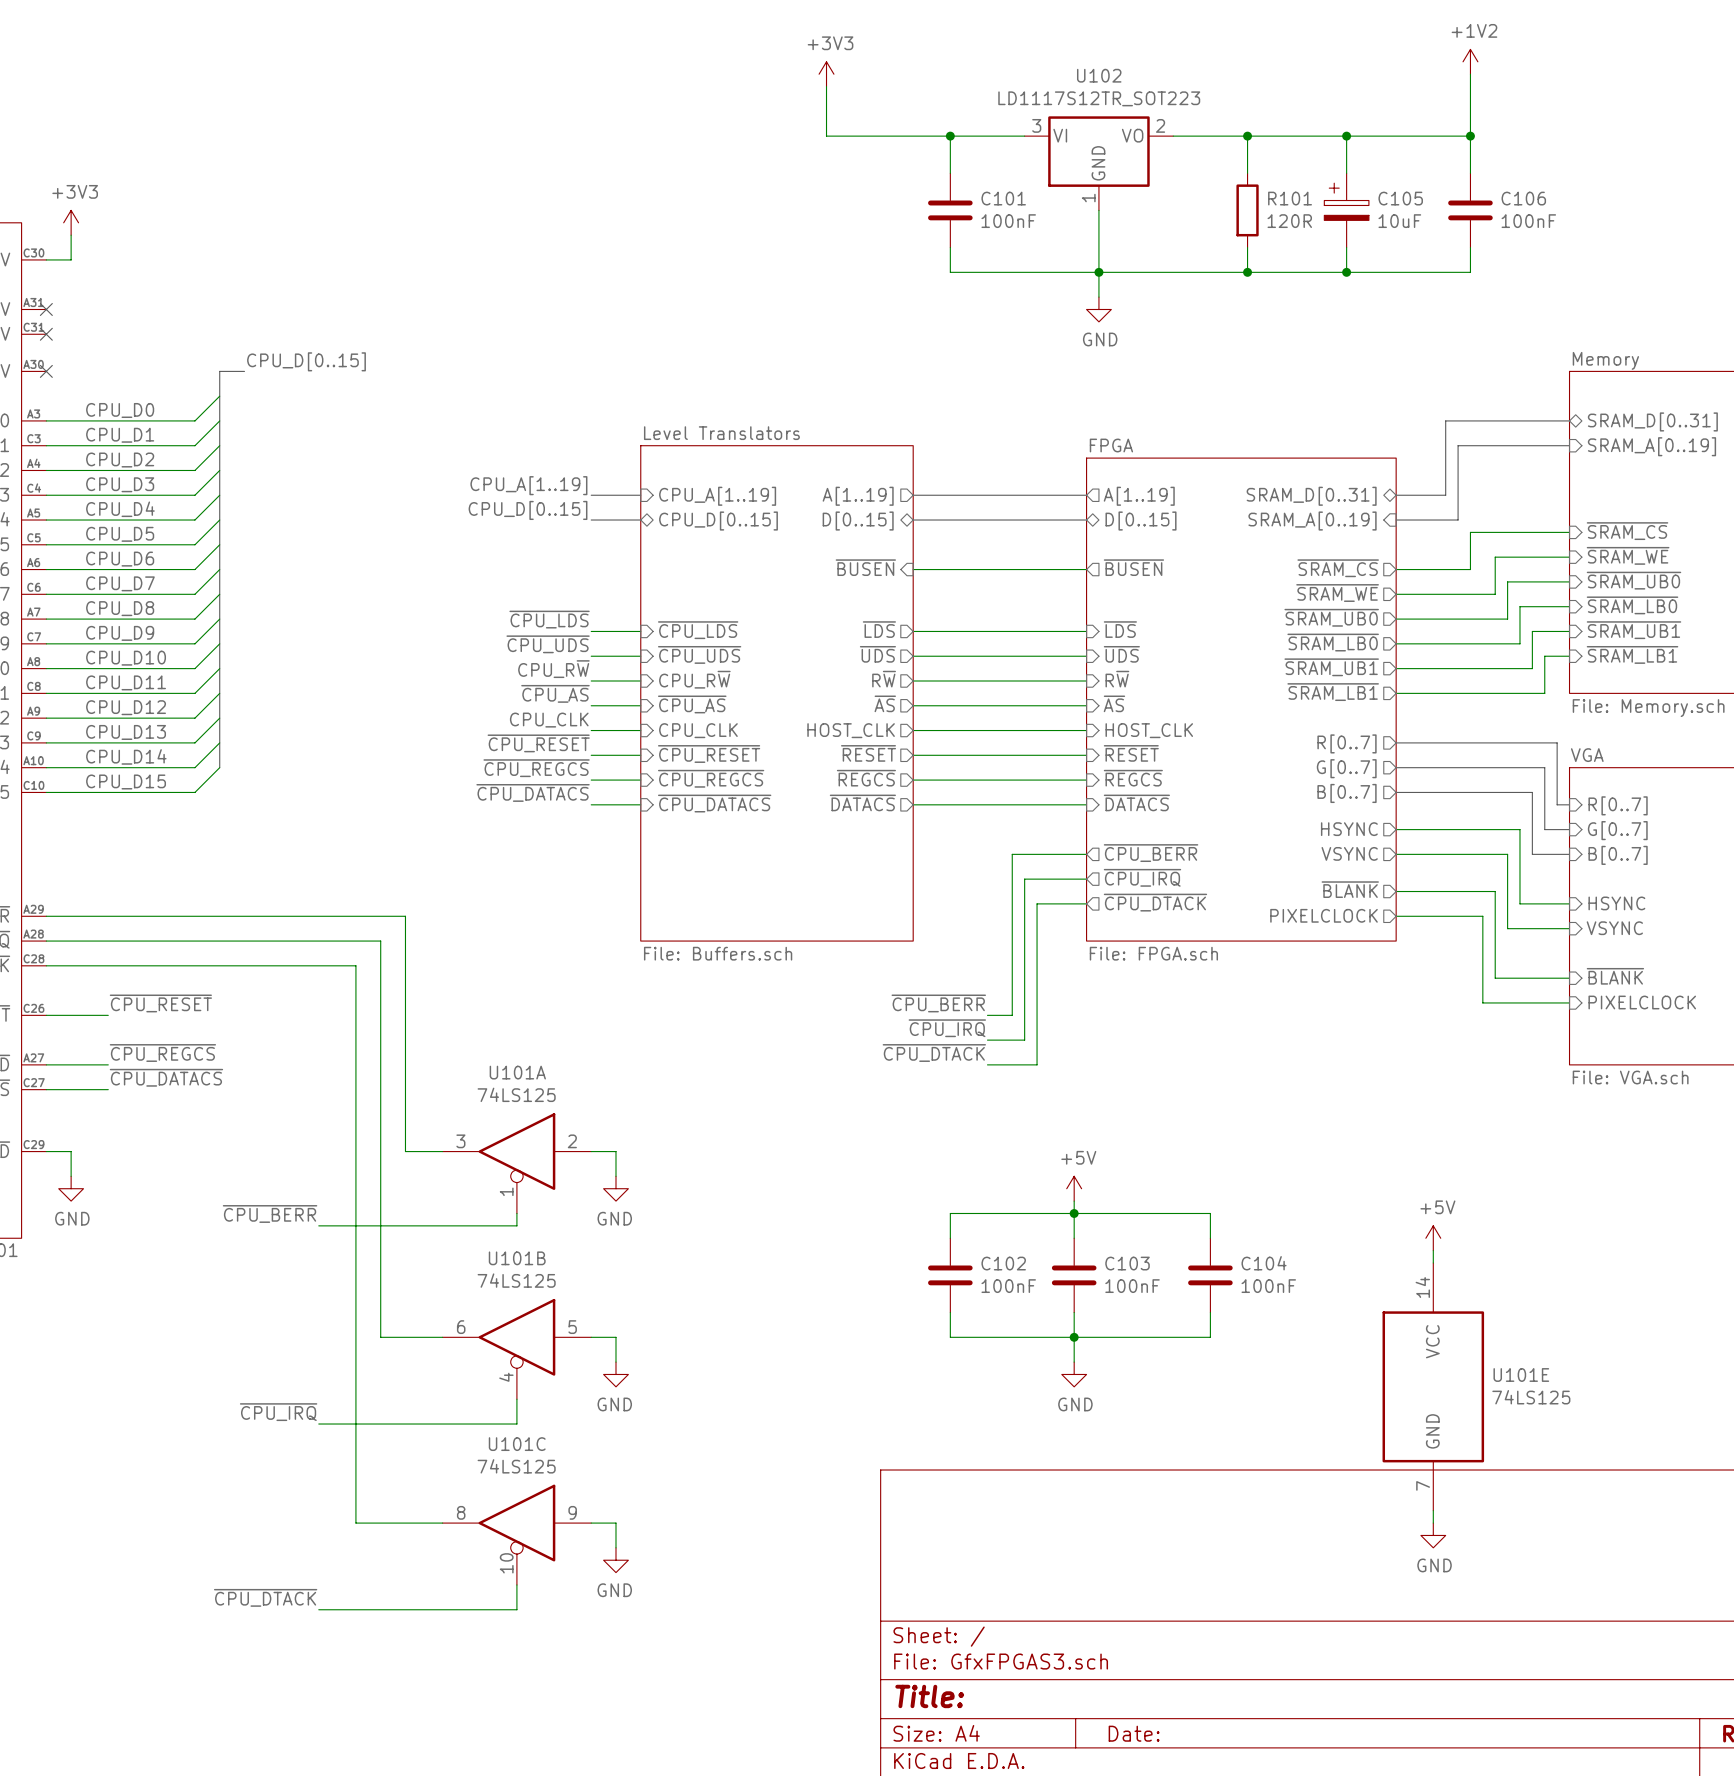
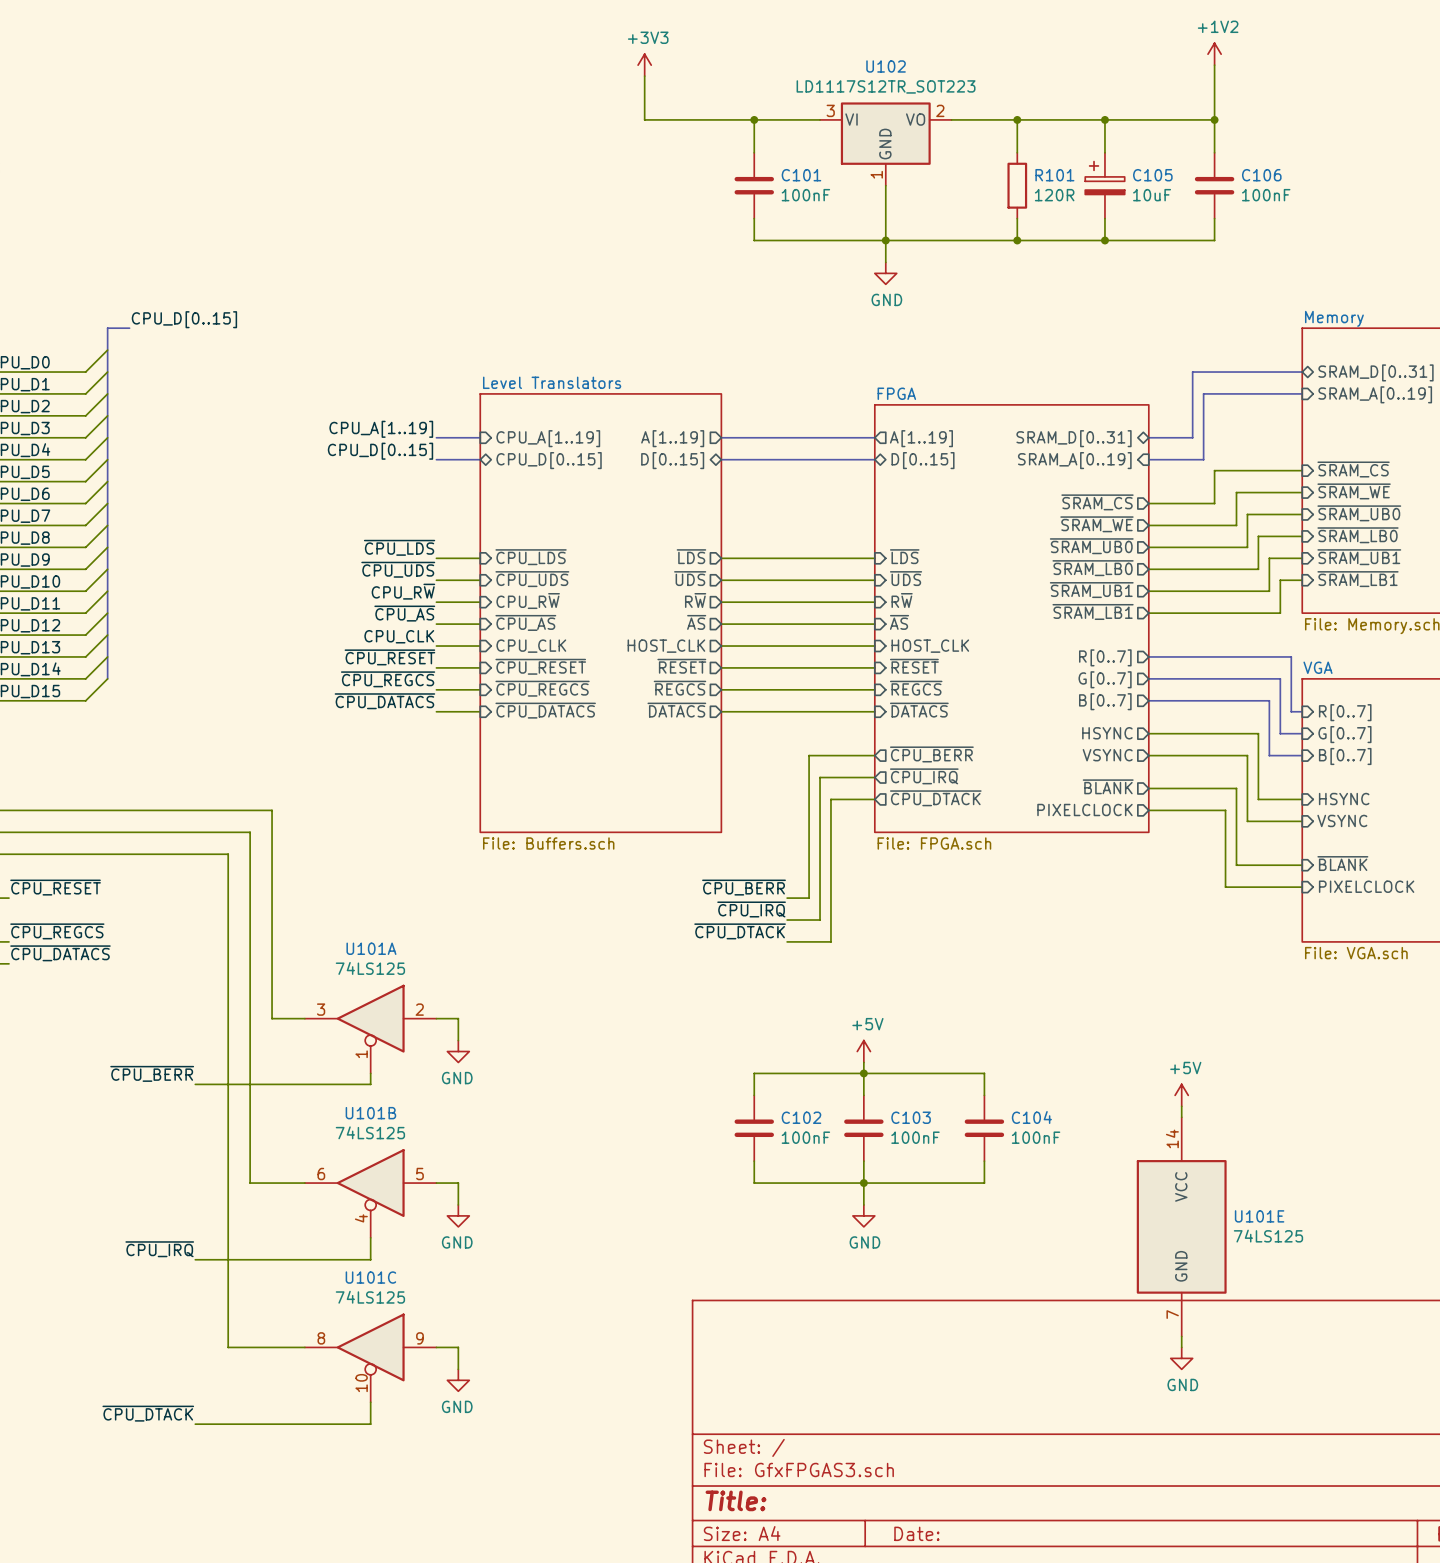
sheet pin: ~{BUSEN} (865, 567) -> none
sheet pin: ~{BUSEN} (1133, 567) -> none
wire: (913, 569) (1086, 569) -> none

